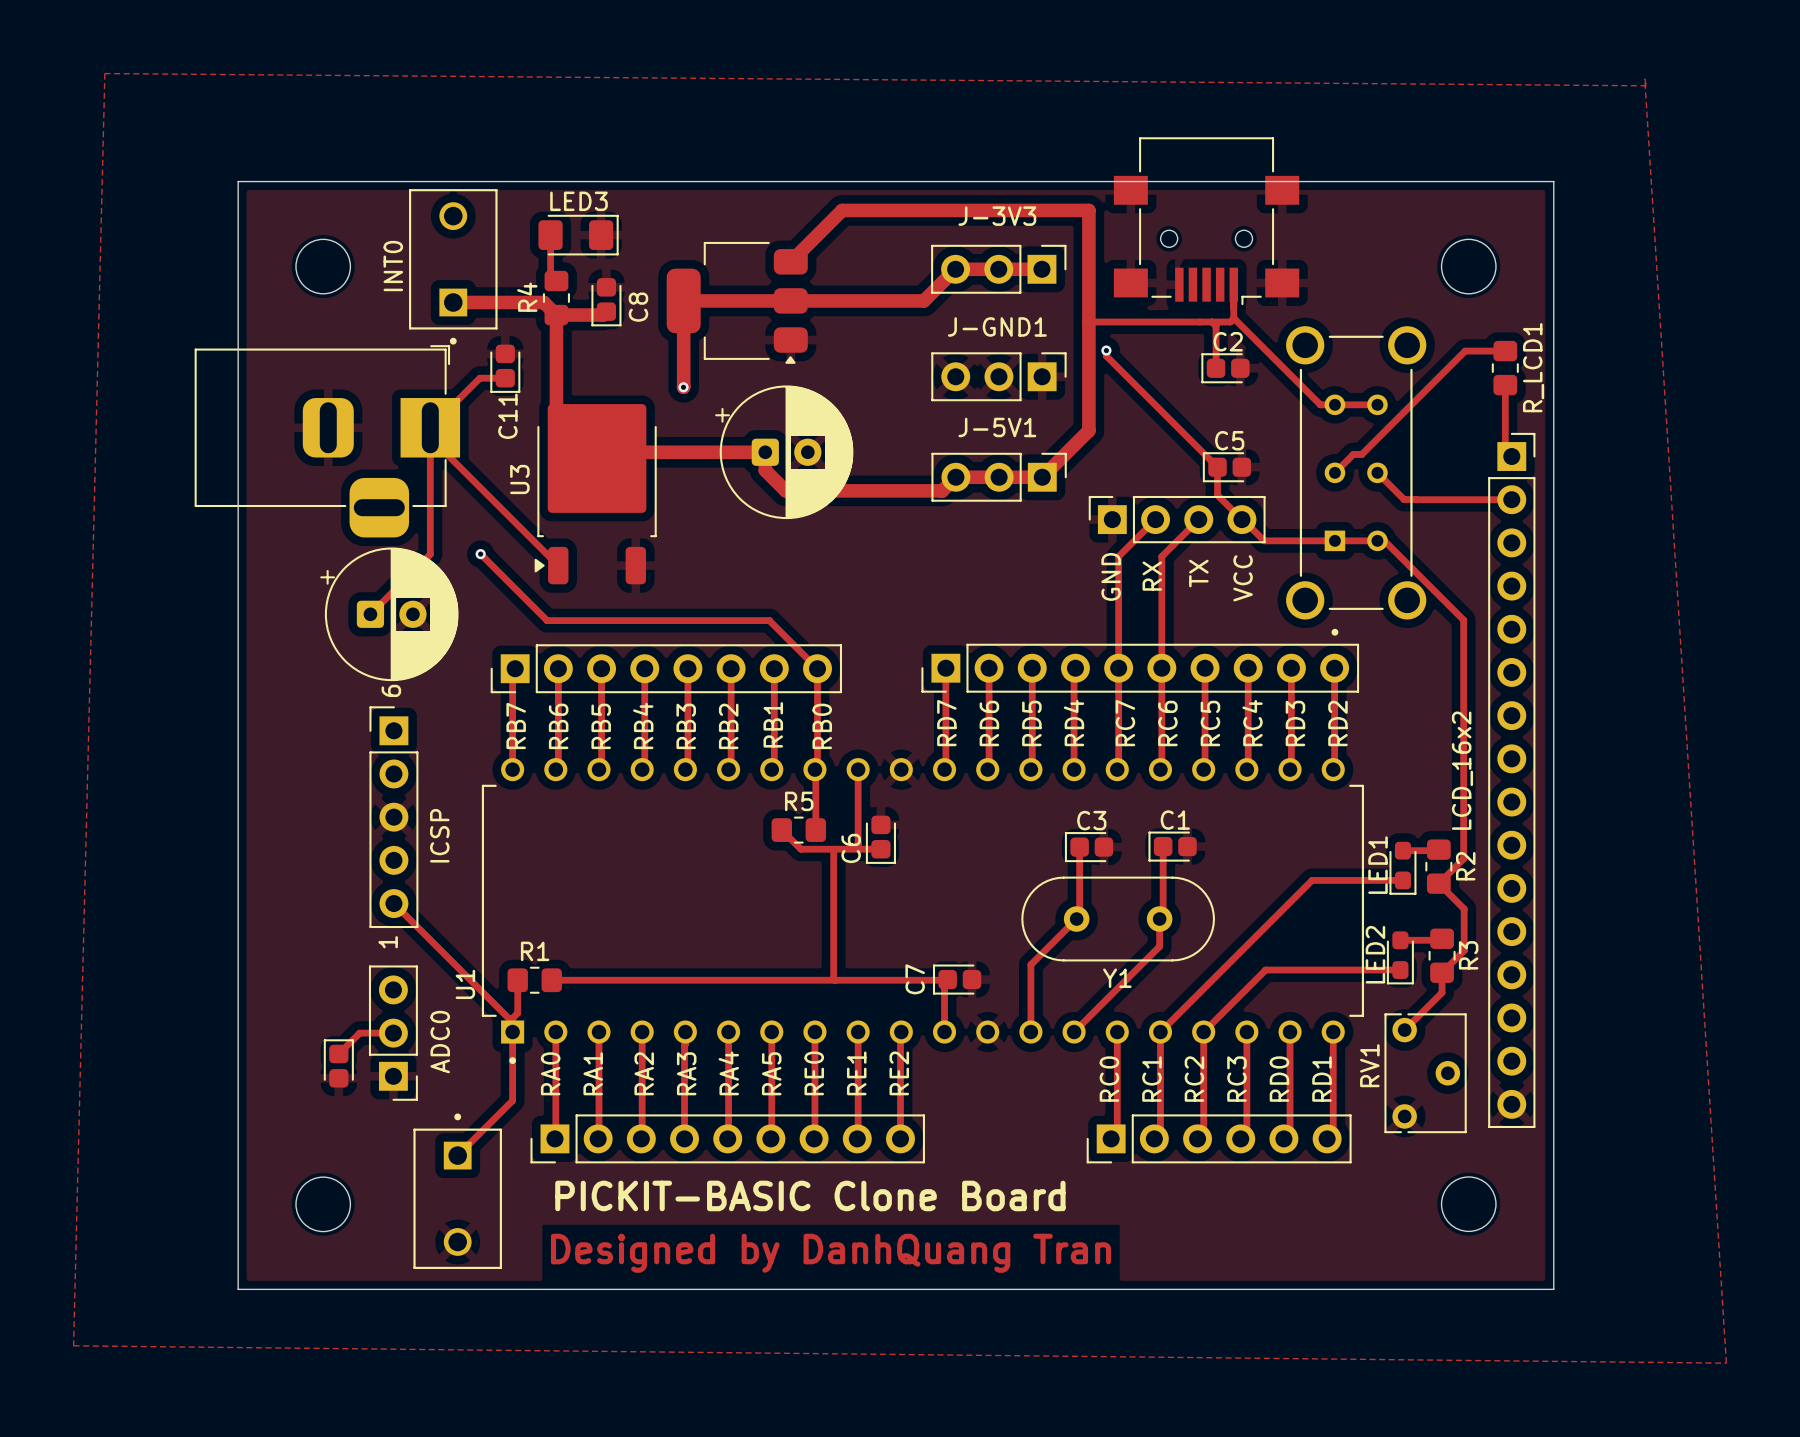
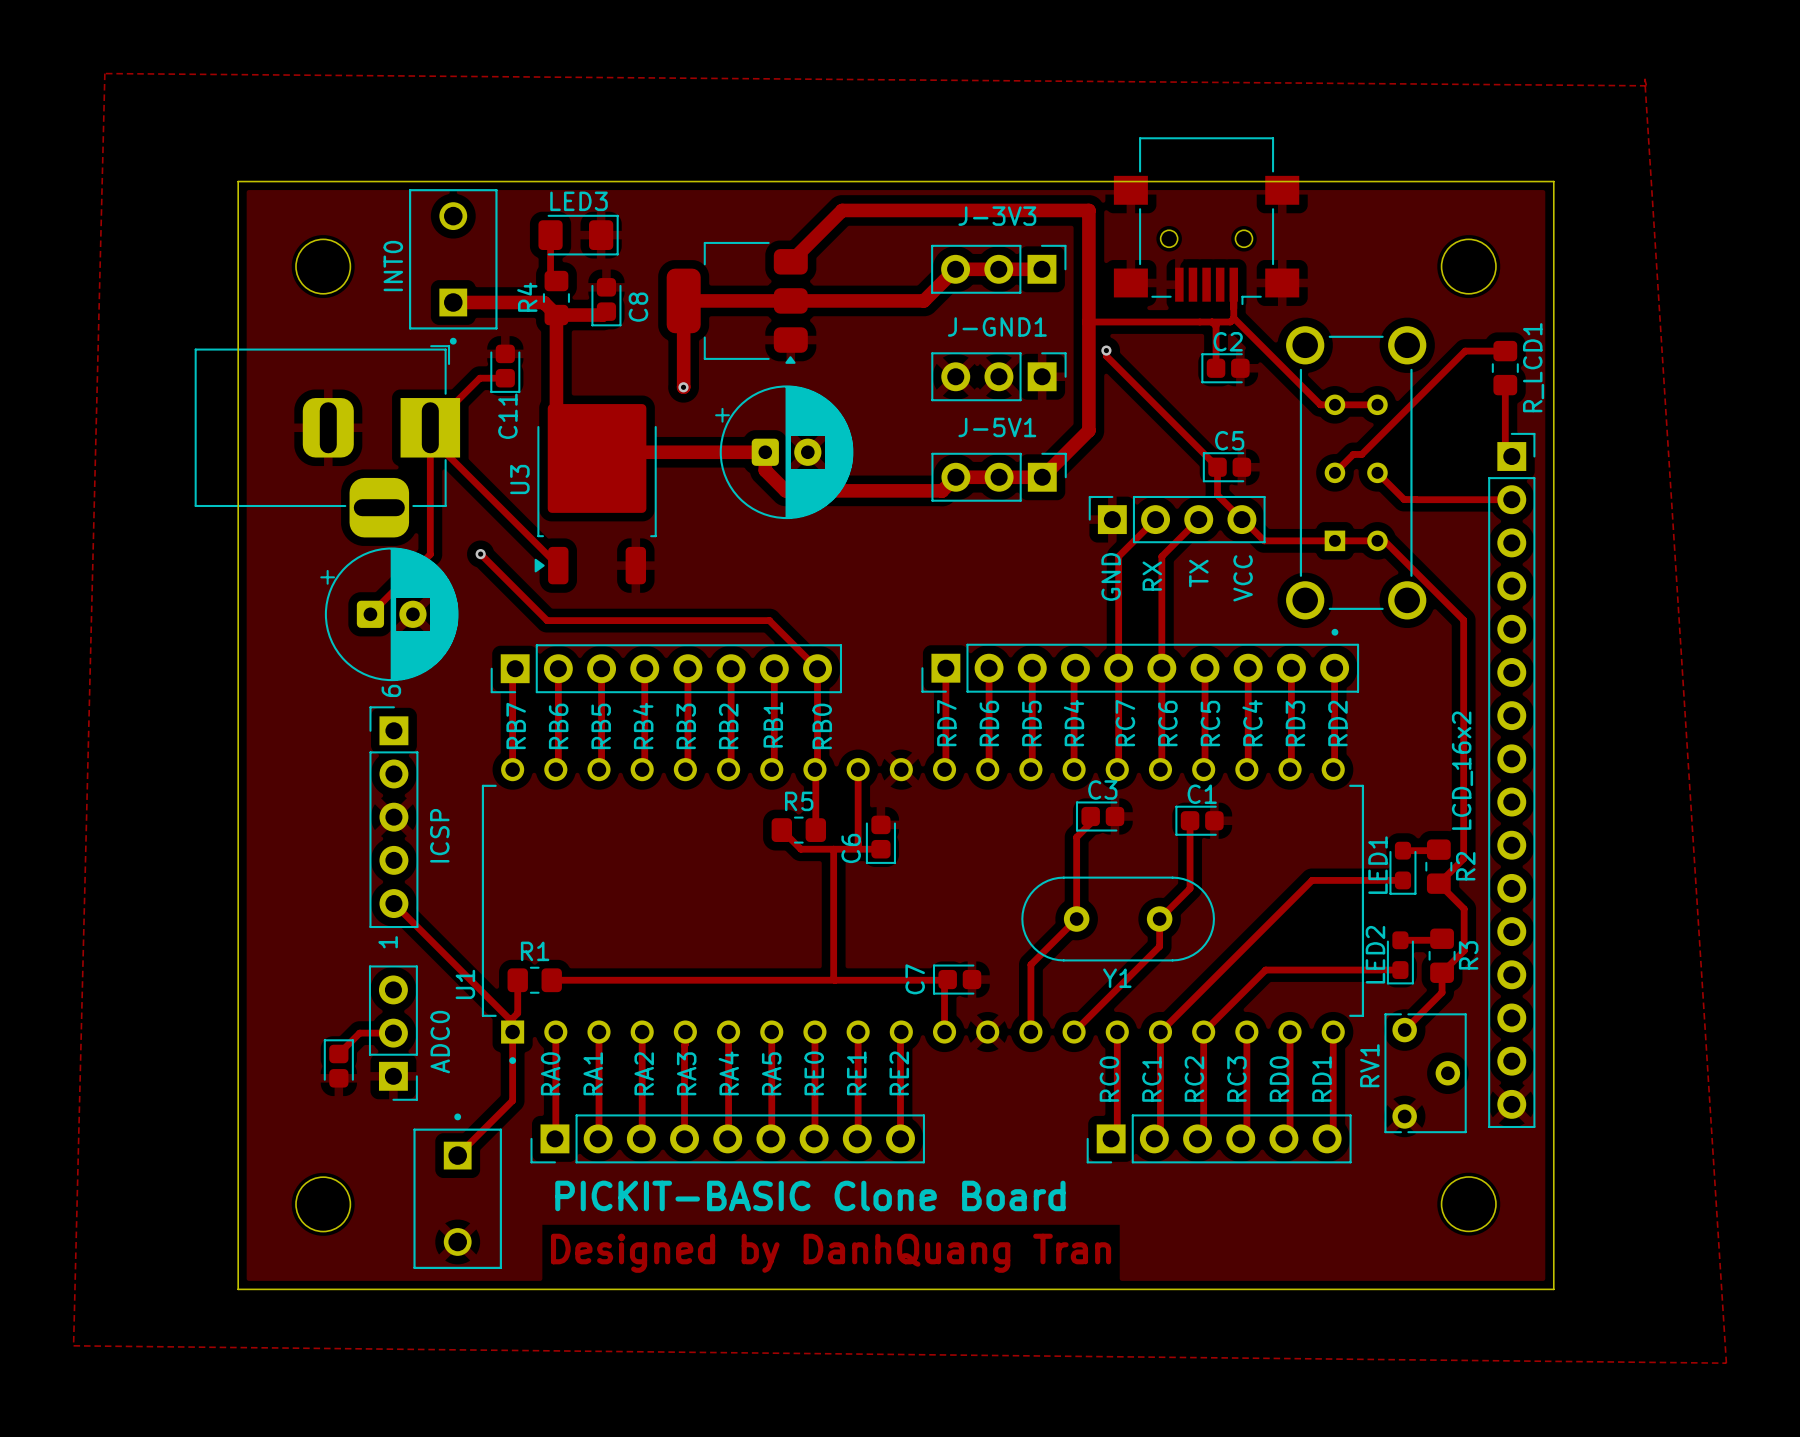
track: (1163, 846) (1163, 915) -> (1190, 820) (1190, 888) (1163, 915)
C1 position: (1172, 846) -> (1199, 820)
track: (1079, 847) (1079, 916) (1076, 919) -> (1090, 816) (1090, 823) (1076, 837) (1076, 919)
C3 position: (1089, 847) -> (1100, 816)

